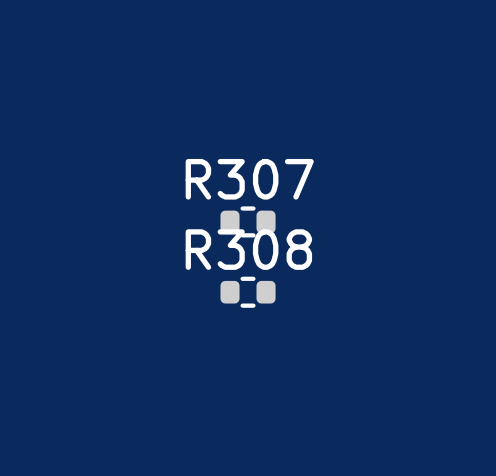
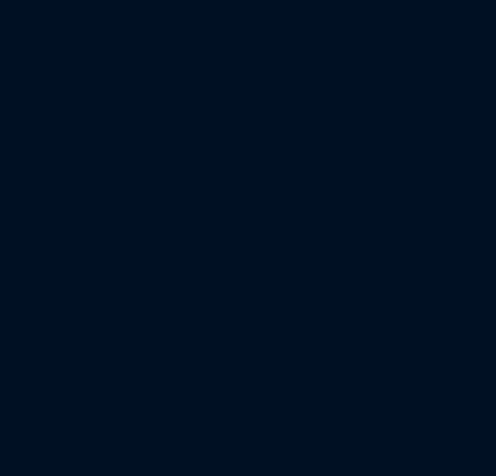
R307: (248, 221) -> none
R308: (248, 292) -> none

